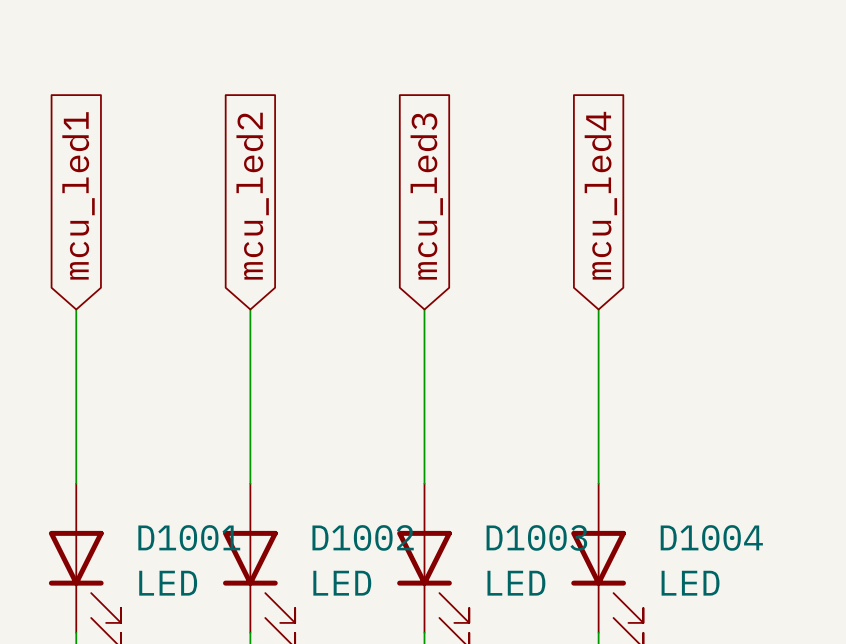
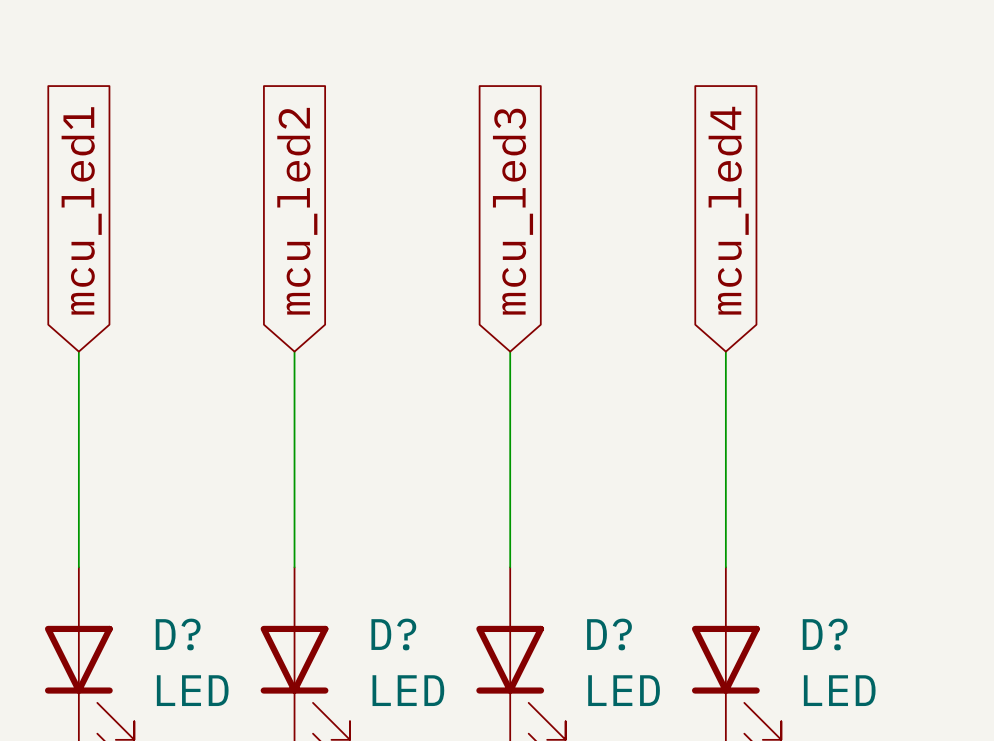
D1001 name: D1001 (189, 537) -> D? (178, 634)
D1002 name: D1002 (363, 537) -> D? (393, 634)
D1003 name: D1003 (536, 537) -> D? (609, 634)
D1004 name: D1004 (711, 537) -> D? (825, 634)

